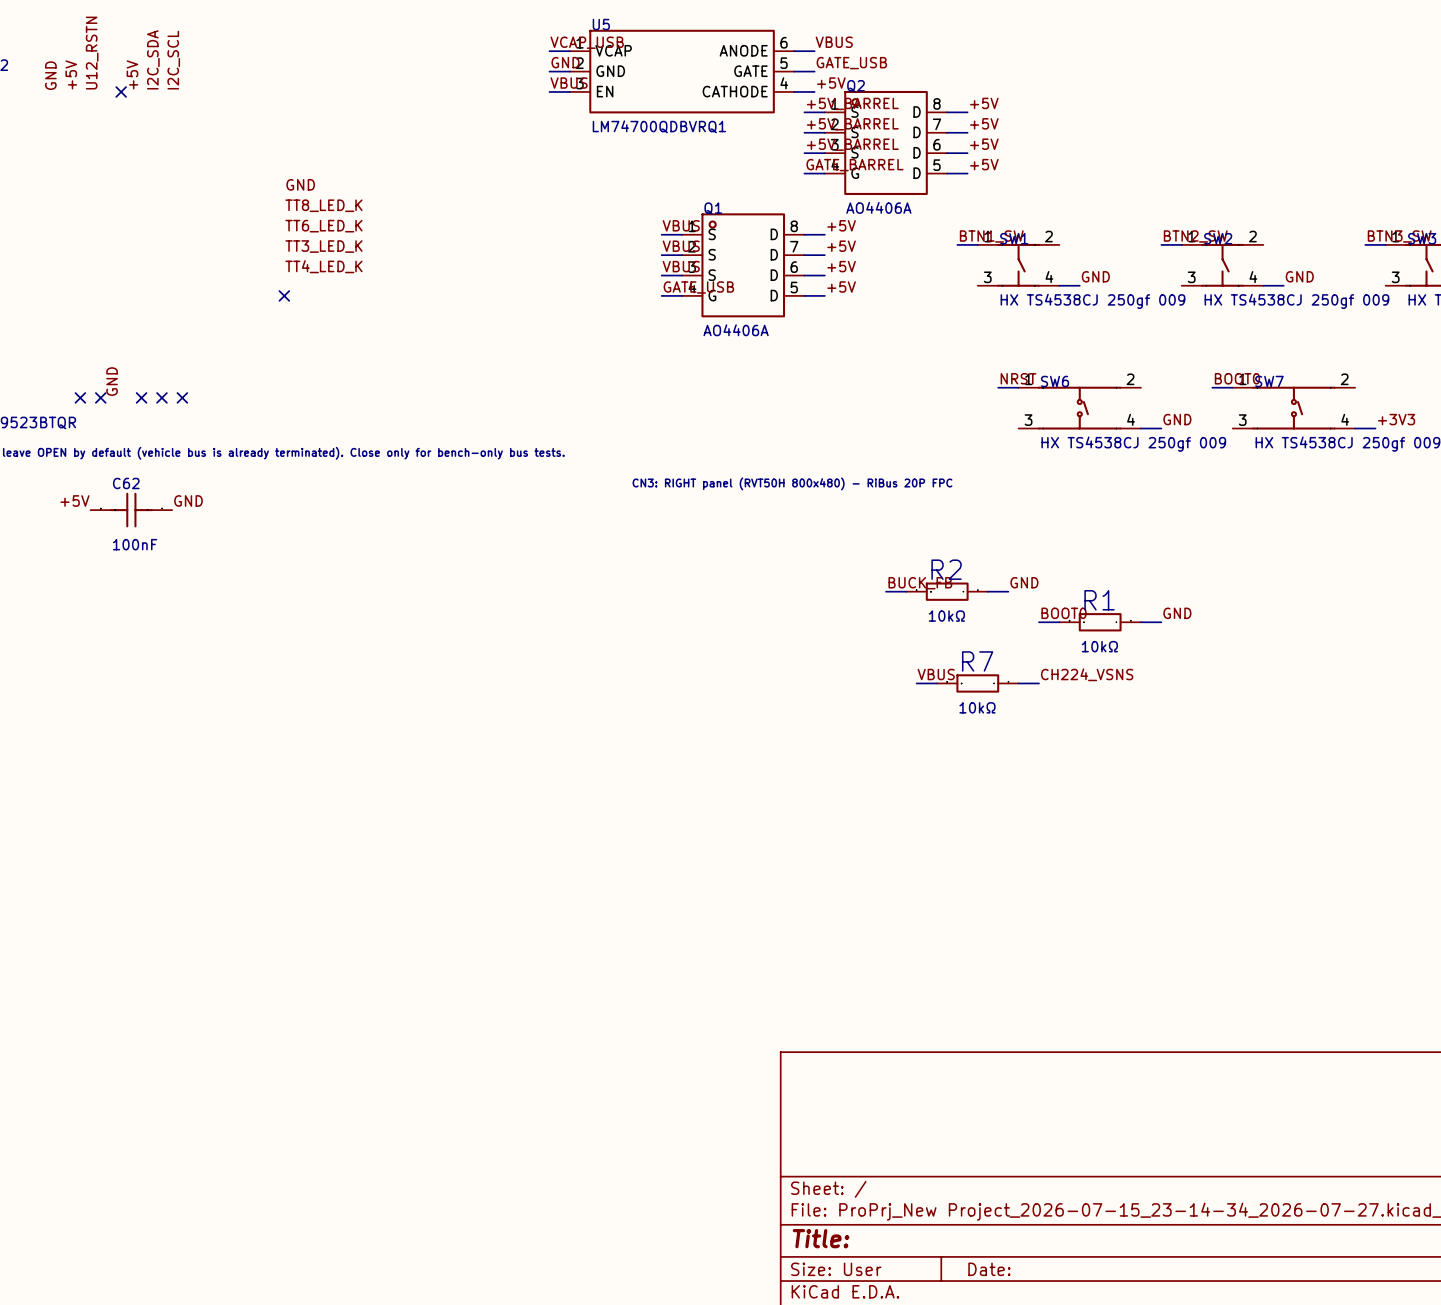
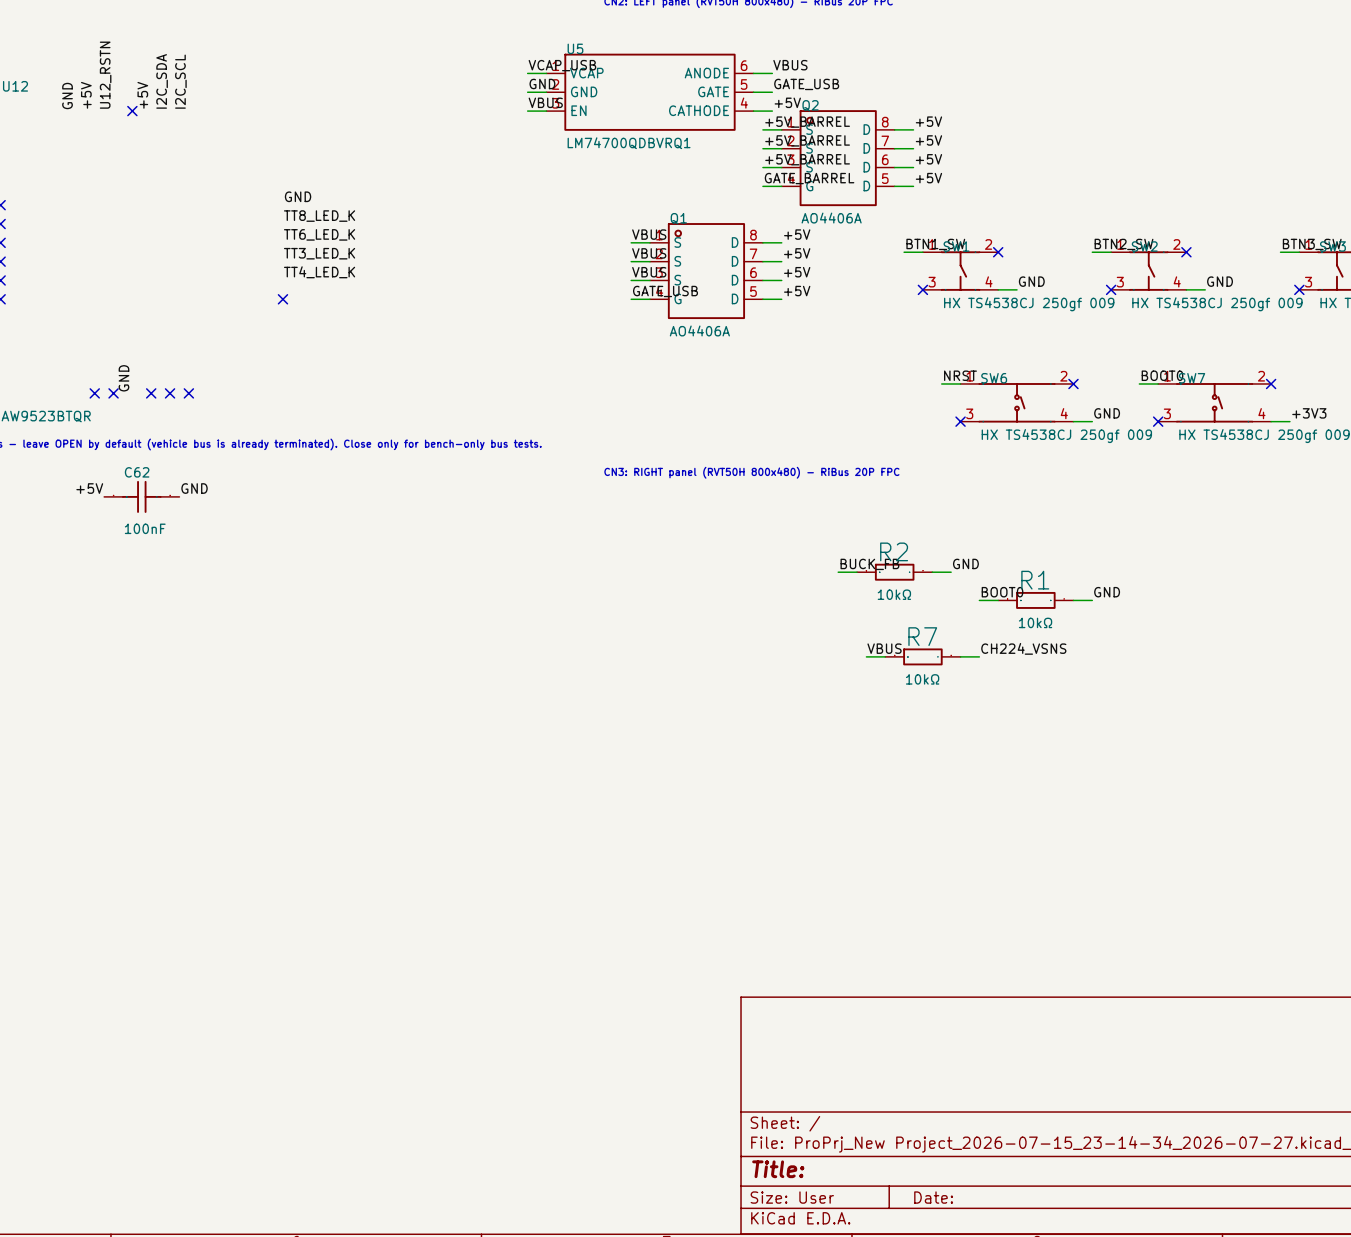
no-connect mark: none -> (998, 252)
no-connect mark: none -> (1186, 252)
no-connect mark: none -> (922, 289)
no-connect mark: none -> (1111, 289)
no-connect mark: none -> (1299, 289)
no-connect mark: none -> (1073, 383)
no-connect mark: none -> (1271, 383)
no-connect mark: none -> (960, 421)
no-connect mark: none -> (1158, 421)

